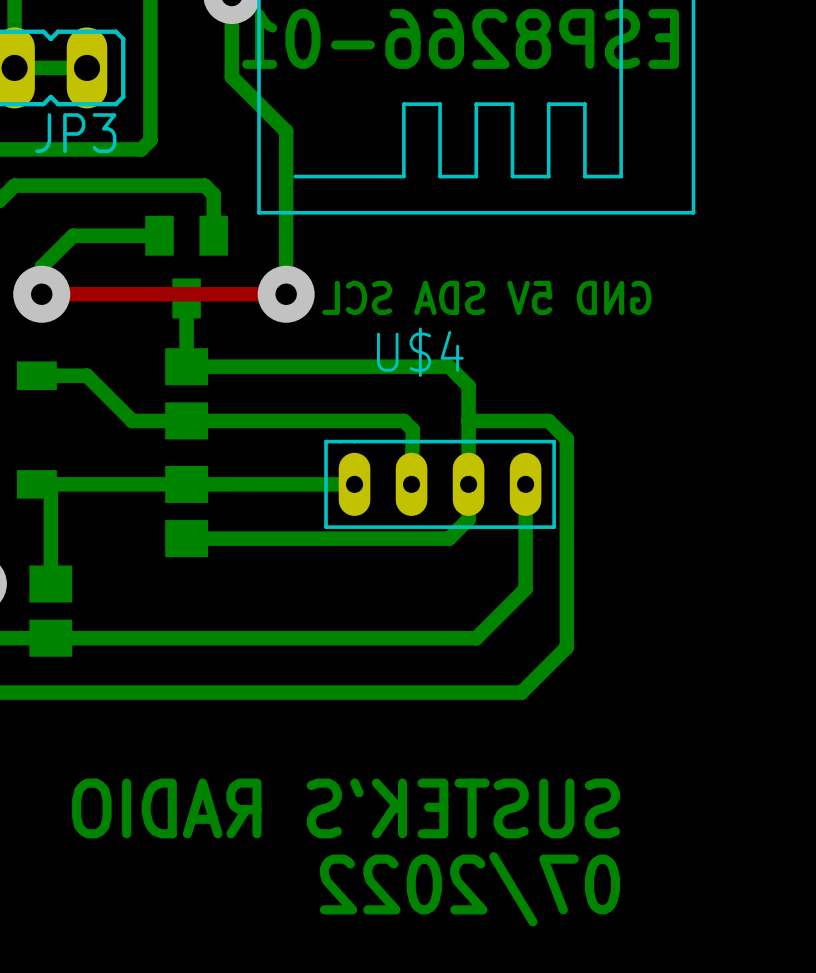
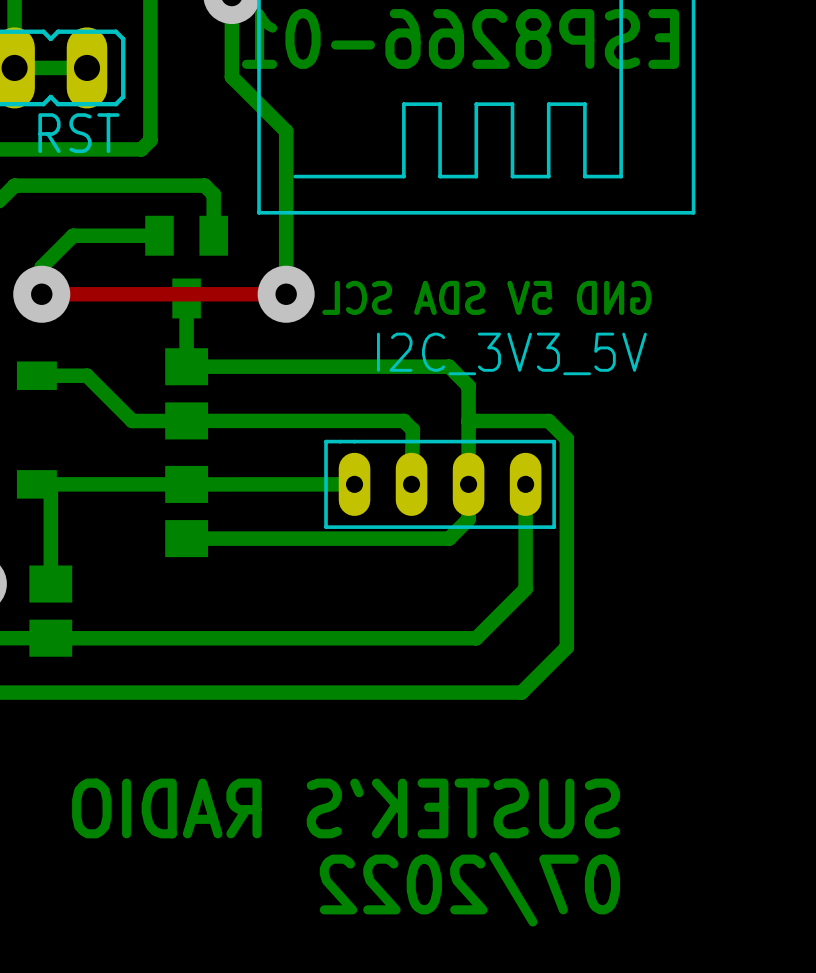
JP3 name: JP3 (75, 133) -> RST (78, 133)
U$4 name: U$4 (420, 352) -> I2C_3V3_5V (511, 353)

